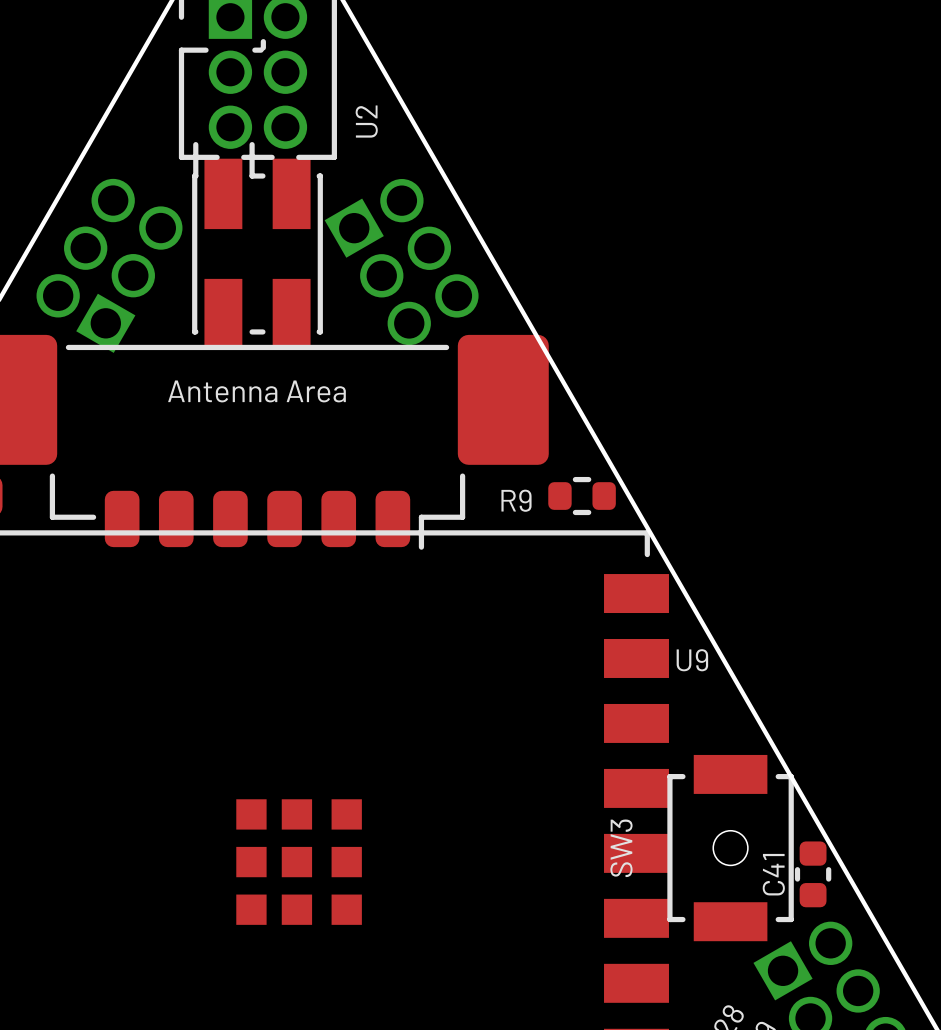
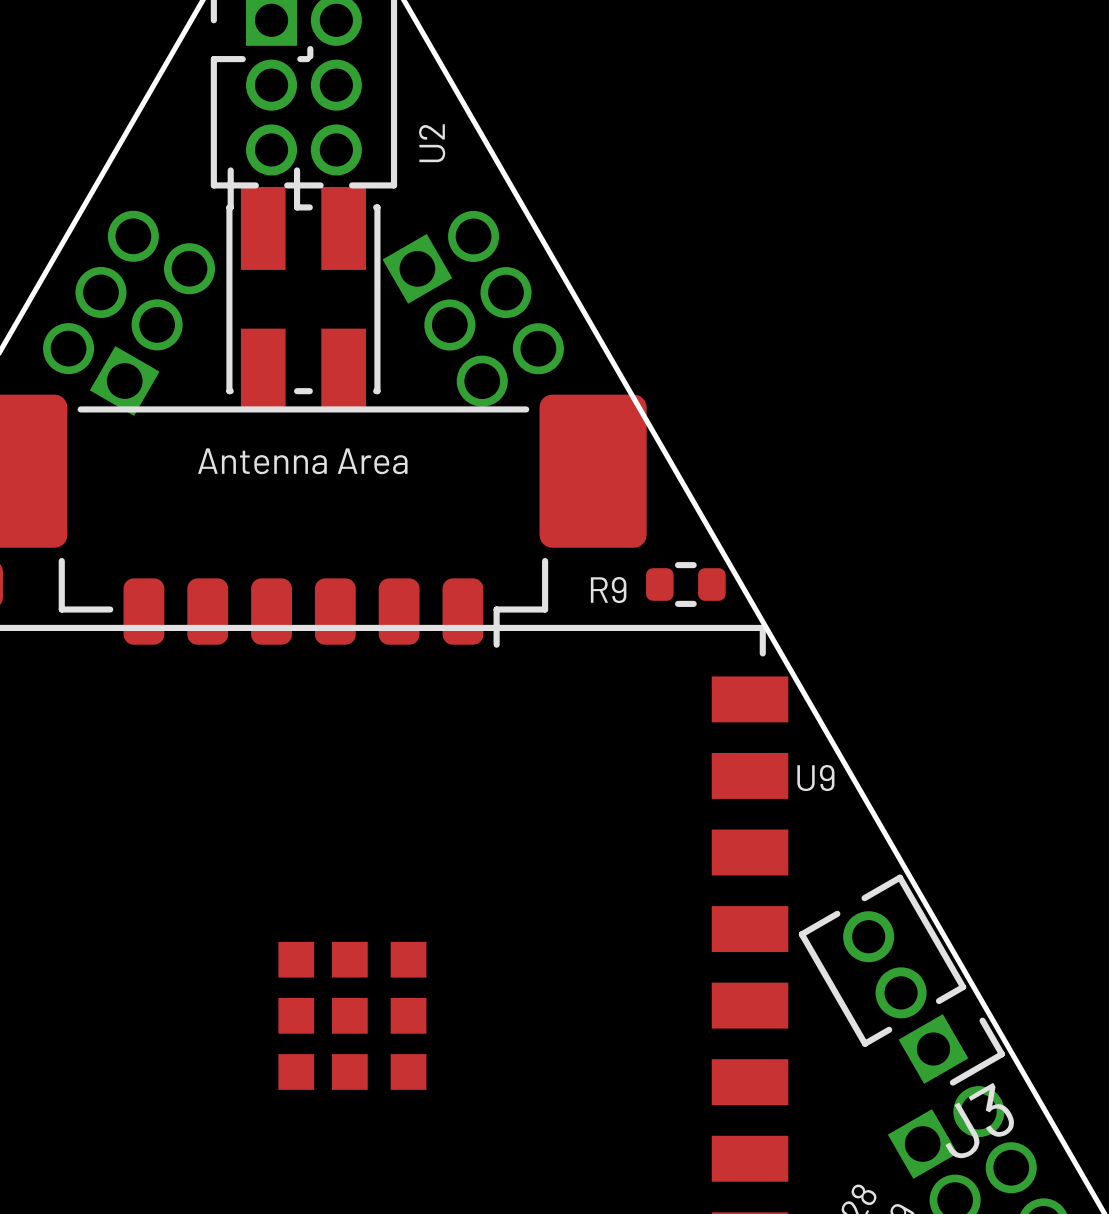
J3: none -> (901, 980)
SW3: (730, 848) -> none
C41: (813, 874) -> none

